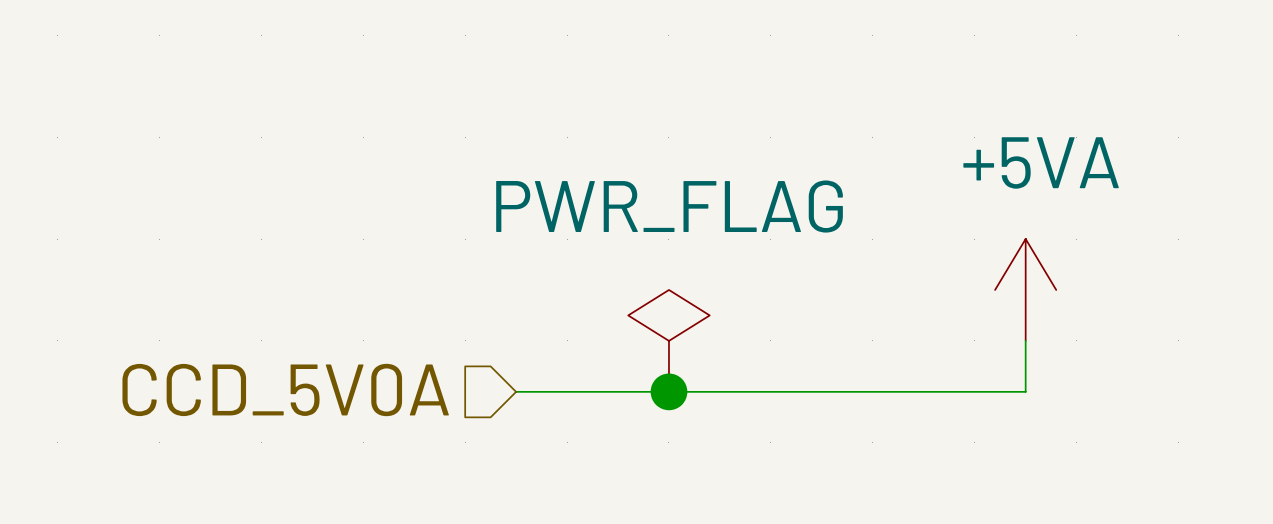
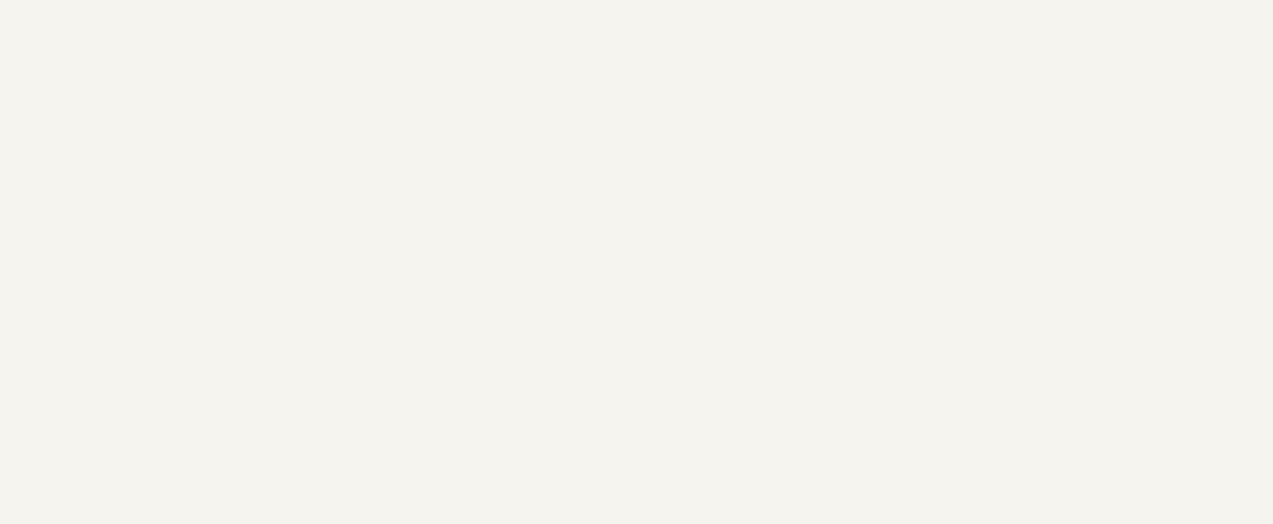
power symbol: +5VA (1025, 289) -> none
power symbol: PWR_FLAG (668, 340) -> none
wire: (1025, 340) (1025, 391) (516, 391) -> none
hierarchical label: CCD_5V0A (285, 389) -> none
junction: (668, 391) -> none

